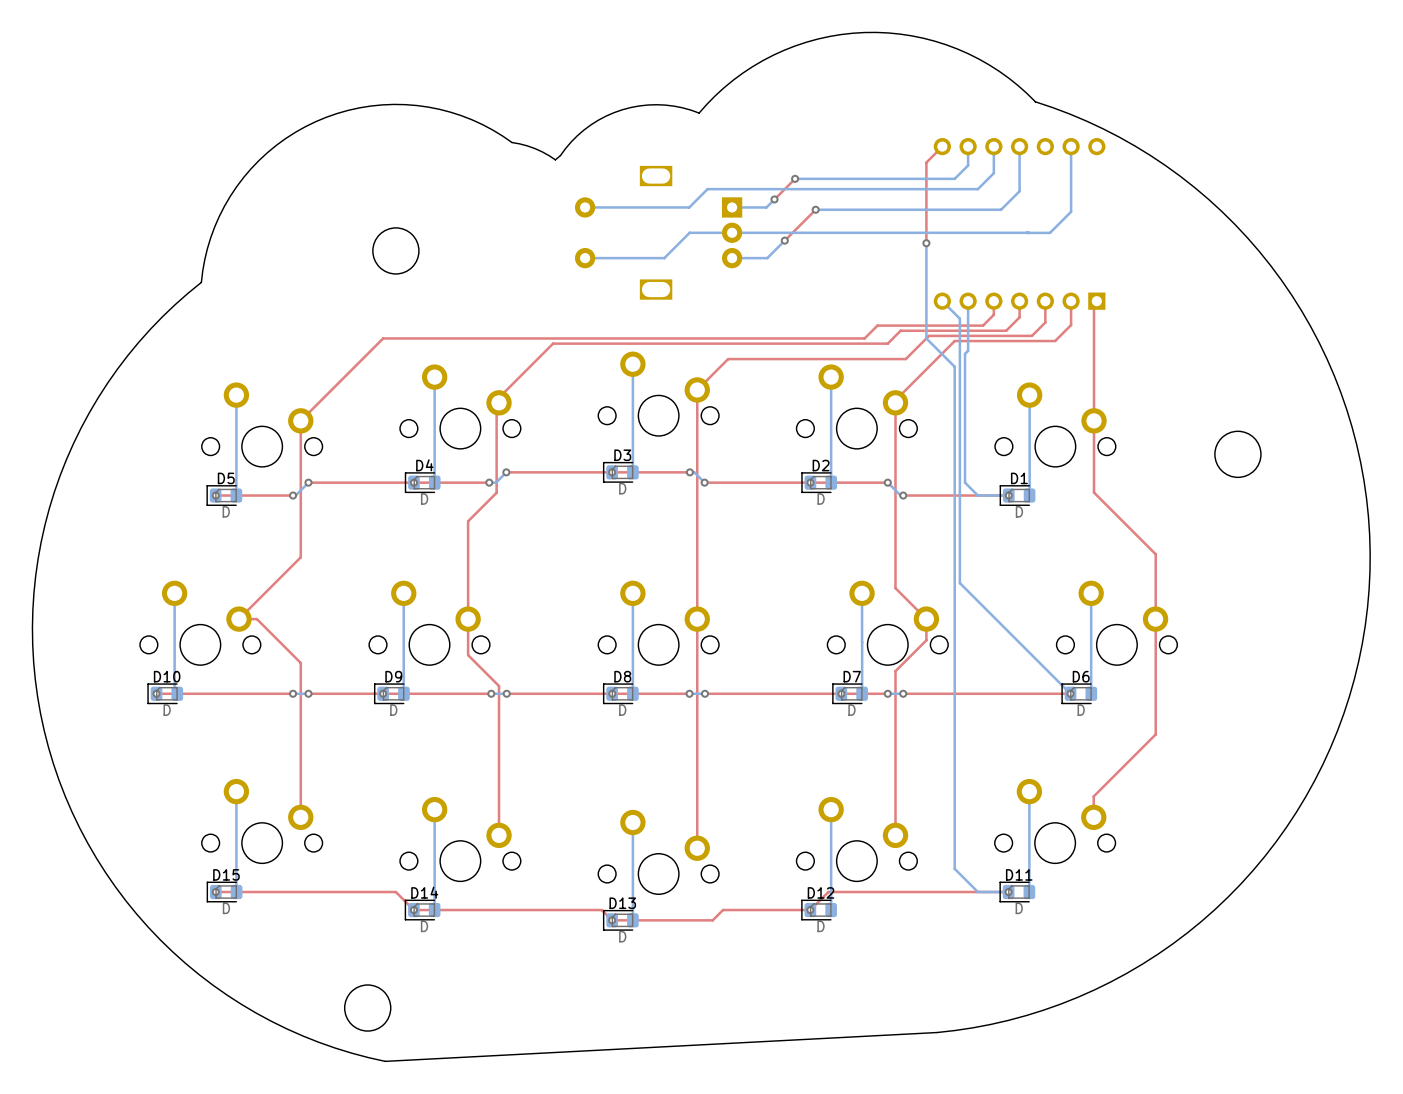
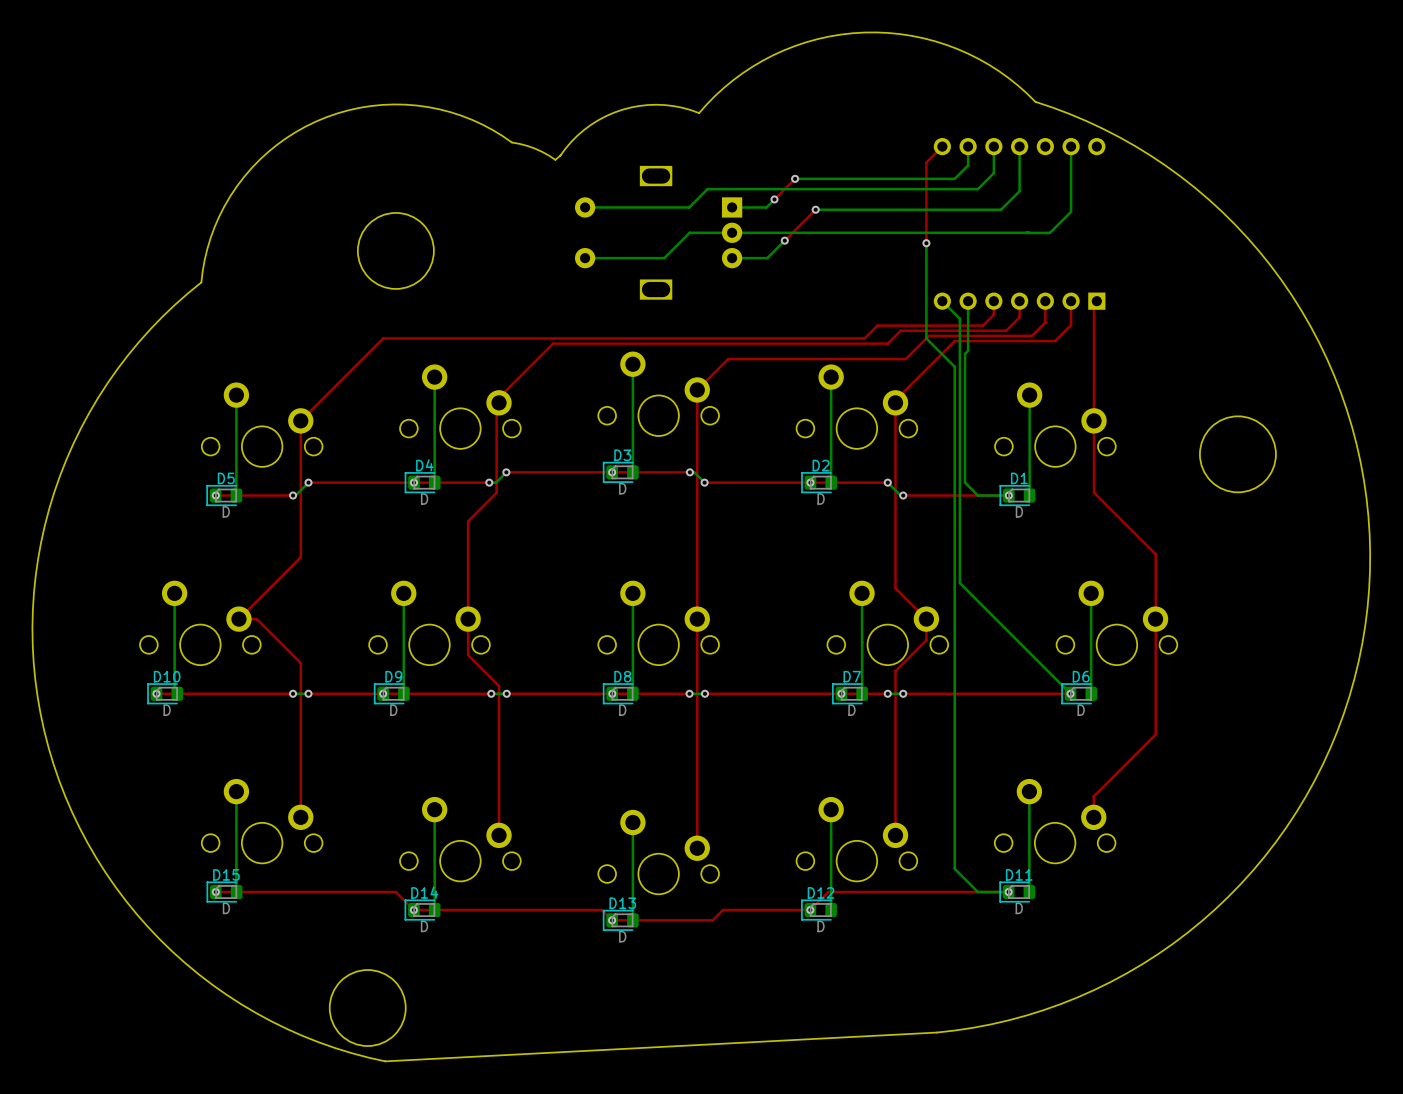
round board edge size: [372, 227, 420, 275] -> [357, 212, 435, 290]
round board edge size: [1214, 430, 1262, 478] -> [1199, 415, 1277, 493]
round board edge size: [344, 984, 392, 1032] -> [329, 969, 407, 1047]

